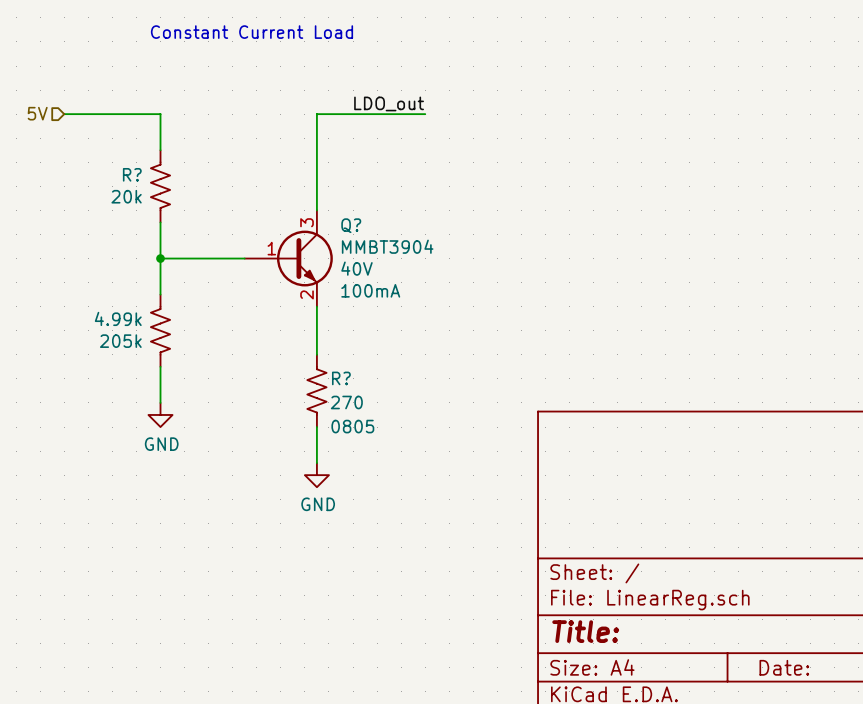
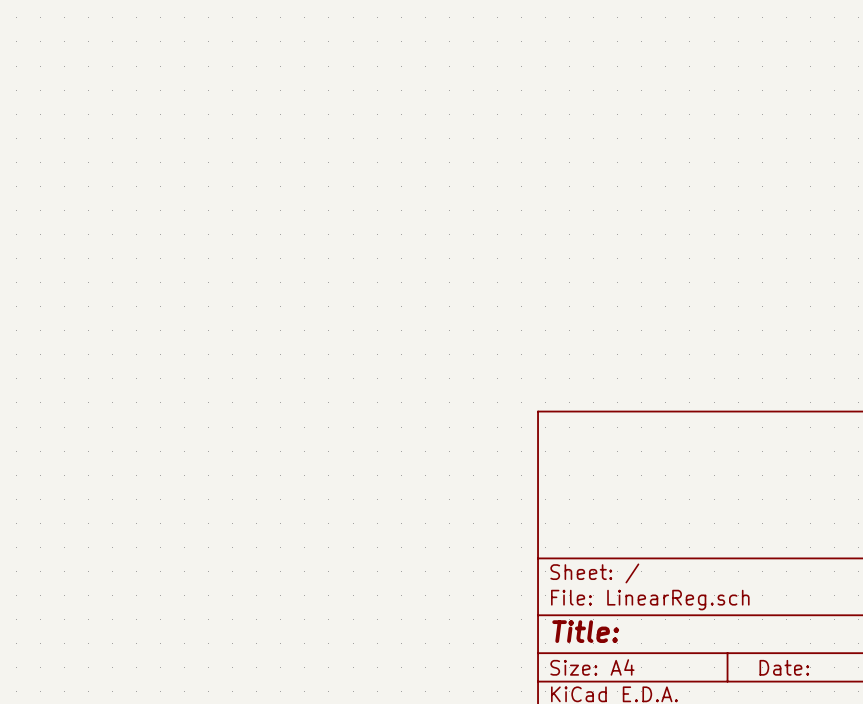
text: Constant Current Load (251, 32) -> none
label: LDO_out (389, 103) -> none
hierarchical label: 5V (37, 113) -> none
wire: (64, 114) (160, 114) (160, 150) -> none
wire: (425, 114) (316, 114) (316, 210) -> none
R?: 20k (160, 186) -> none
wire: (160, 222) (160, 294) -> none
wire: (160, 258) (244, 258) -> none
junction: (160, 258) -> none
Q?: MMBT3904 (288, 258) -> none
wire: (316, 306) (316, 354) -> none
4.99k: 205k (160, 330) -> none
wire: (160, 366) (160, 402) -> none
R?: 270 (316, 390) -> none
power symbol: GND (160, 414) -> none
wire: (316, 427) (316, 463) -> none
power symbol: GND (316, 475) -> none

